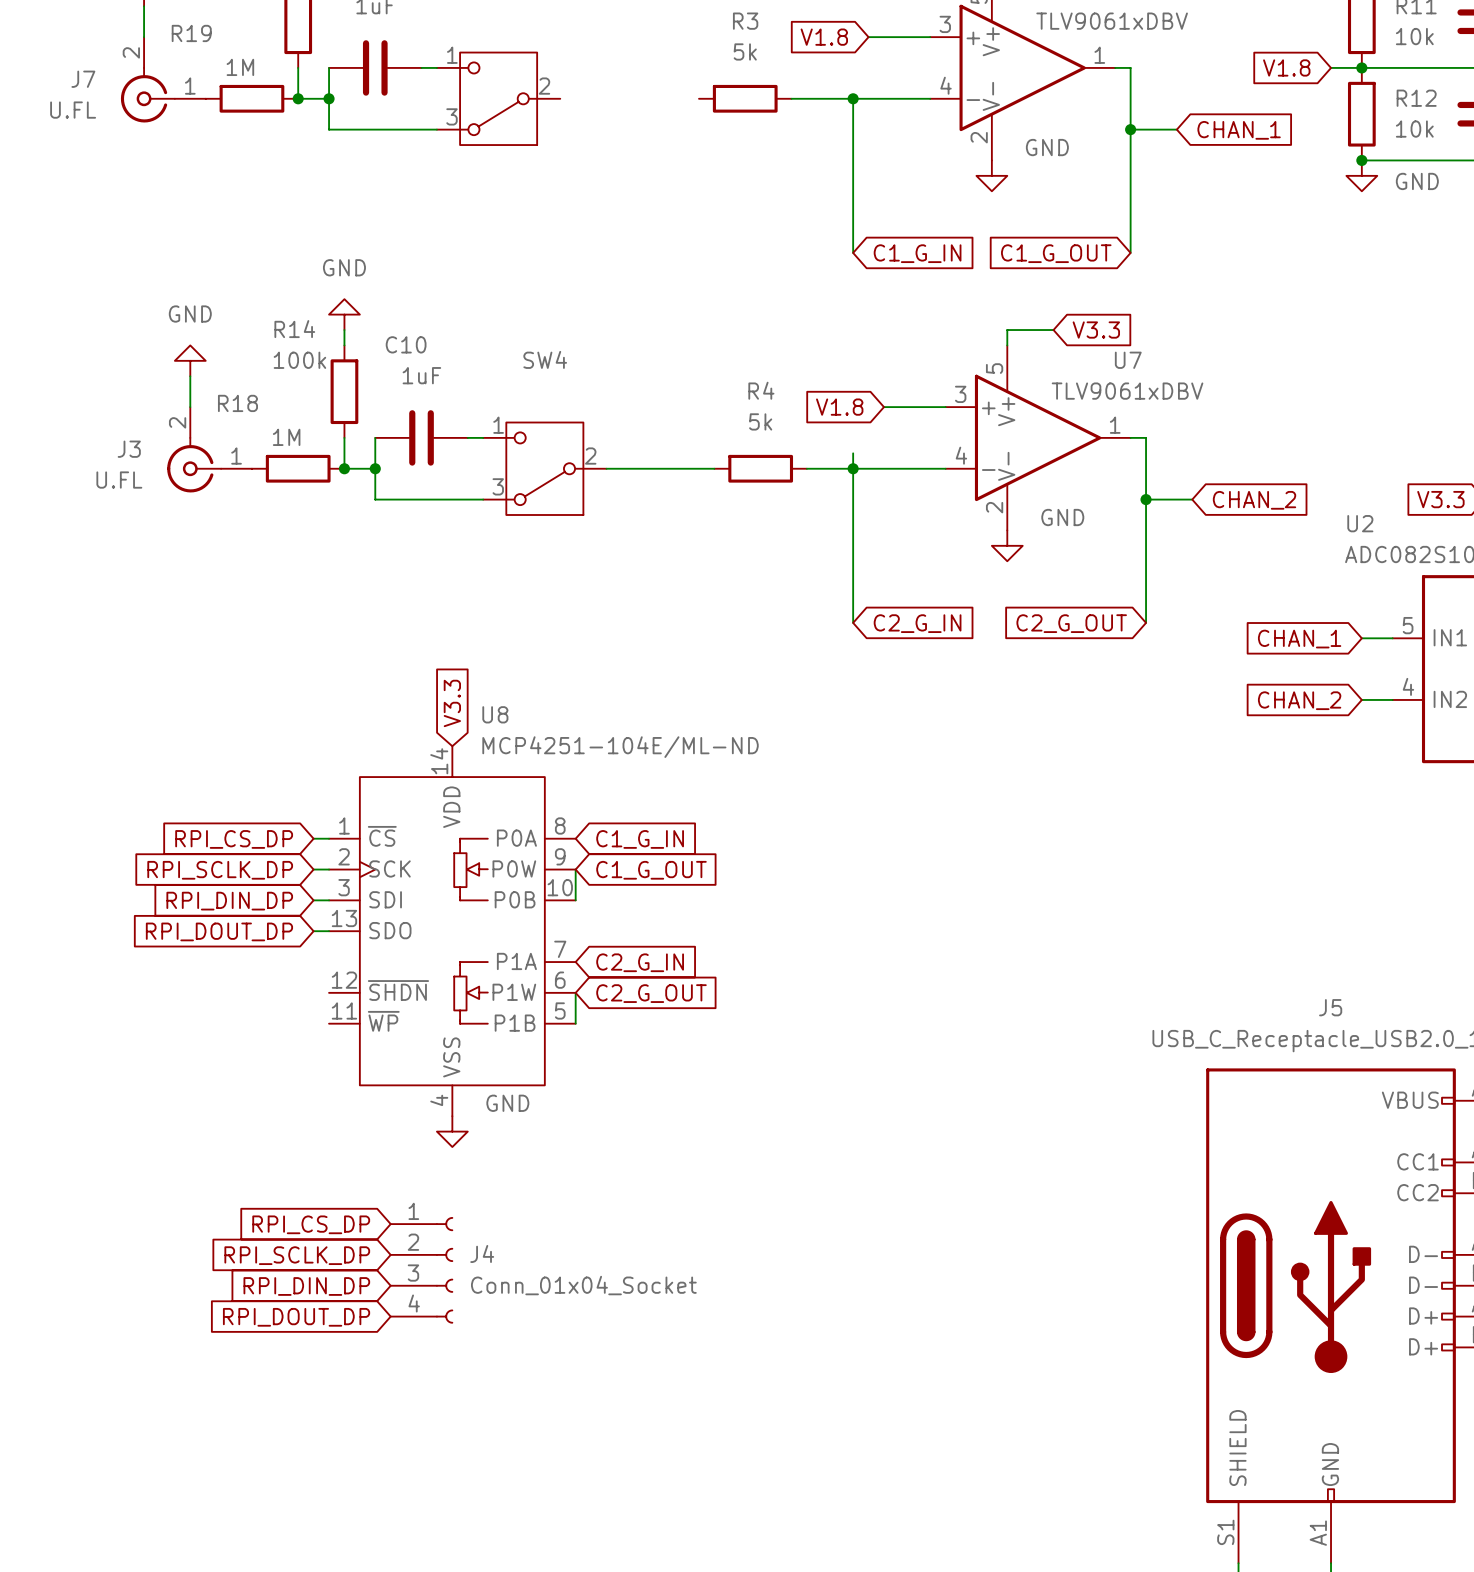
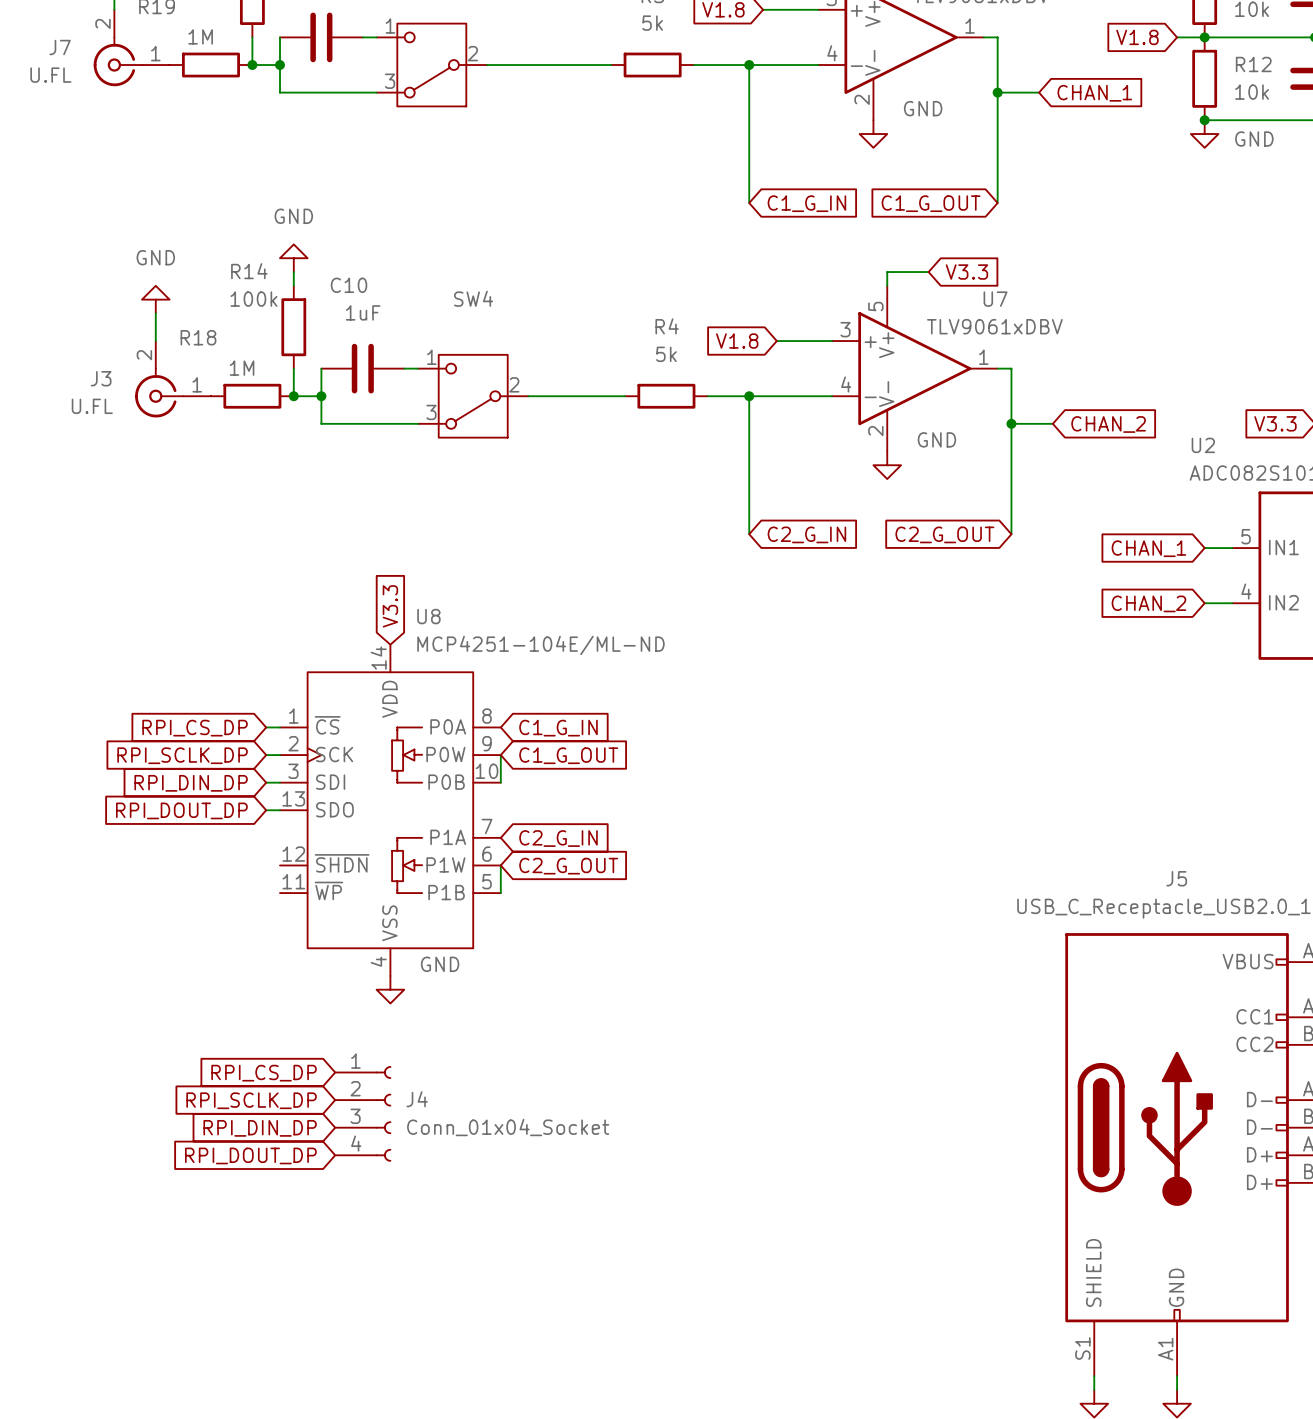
wire: none -> (487, 65) (611, 65)
wire: (853, 453) (853, 468) -> none

